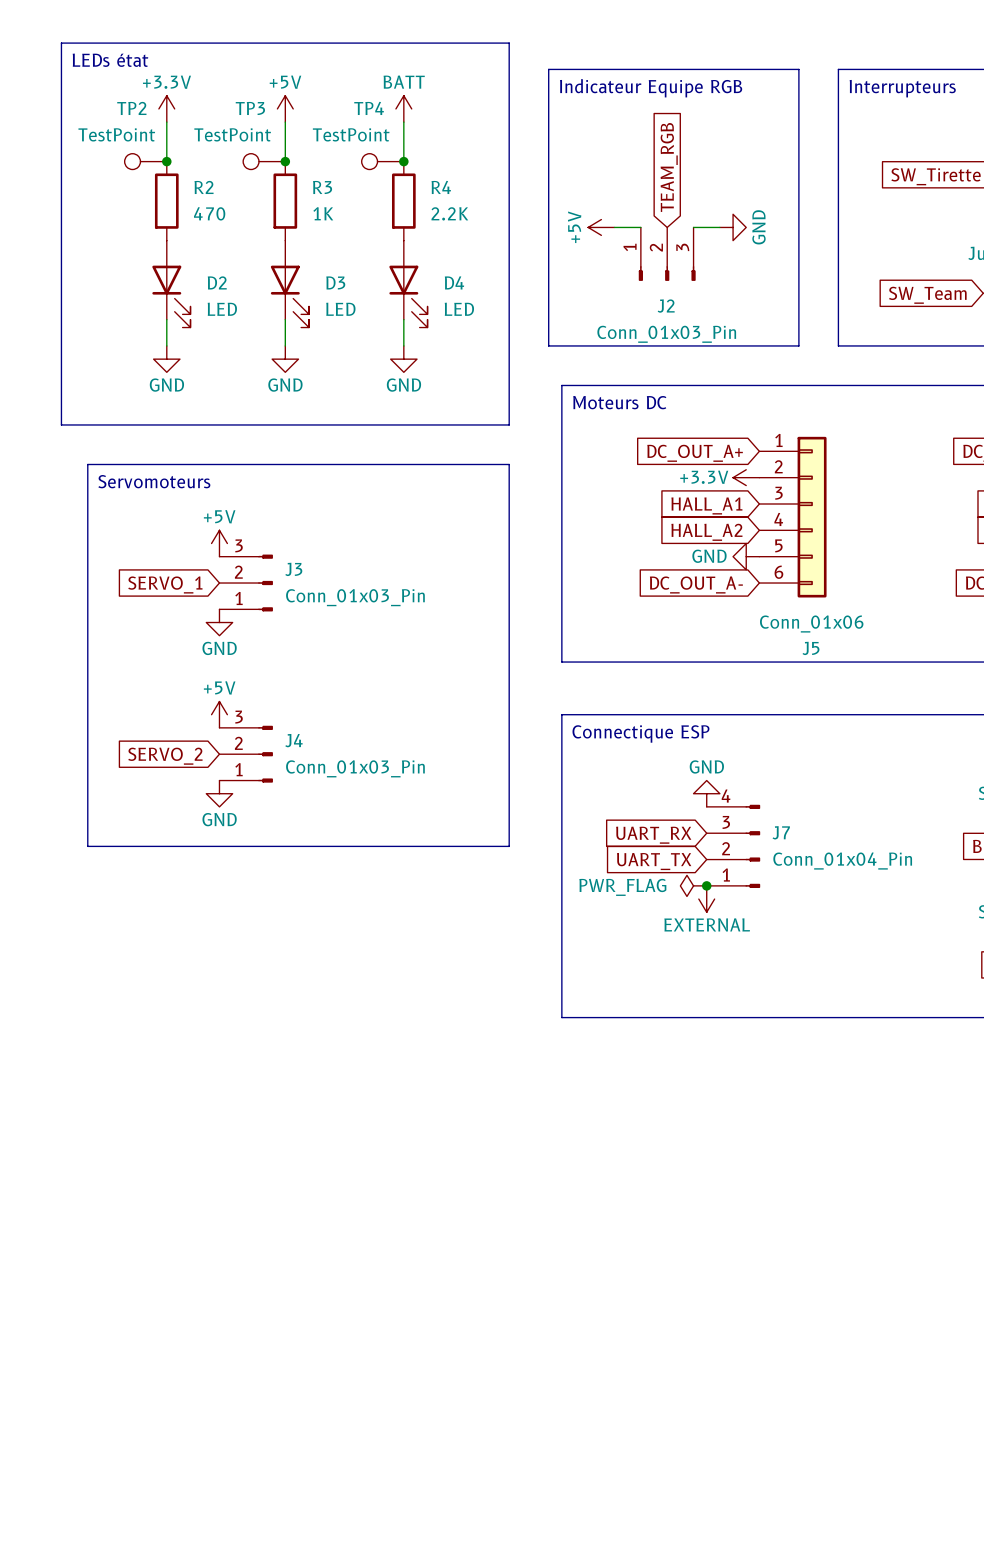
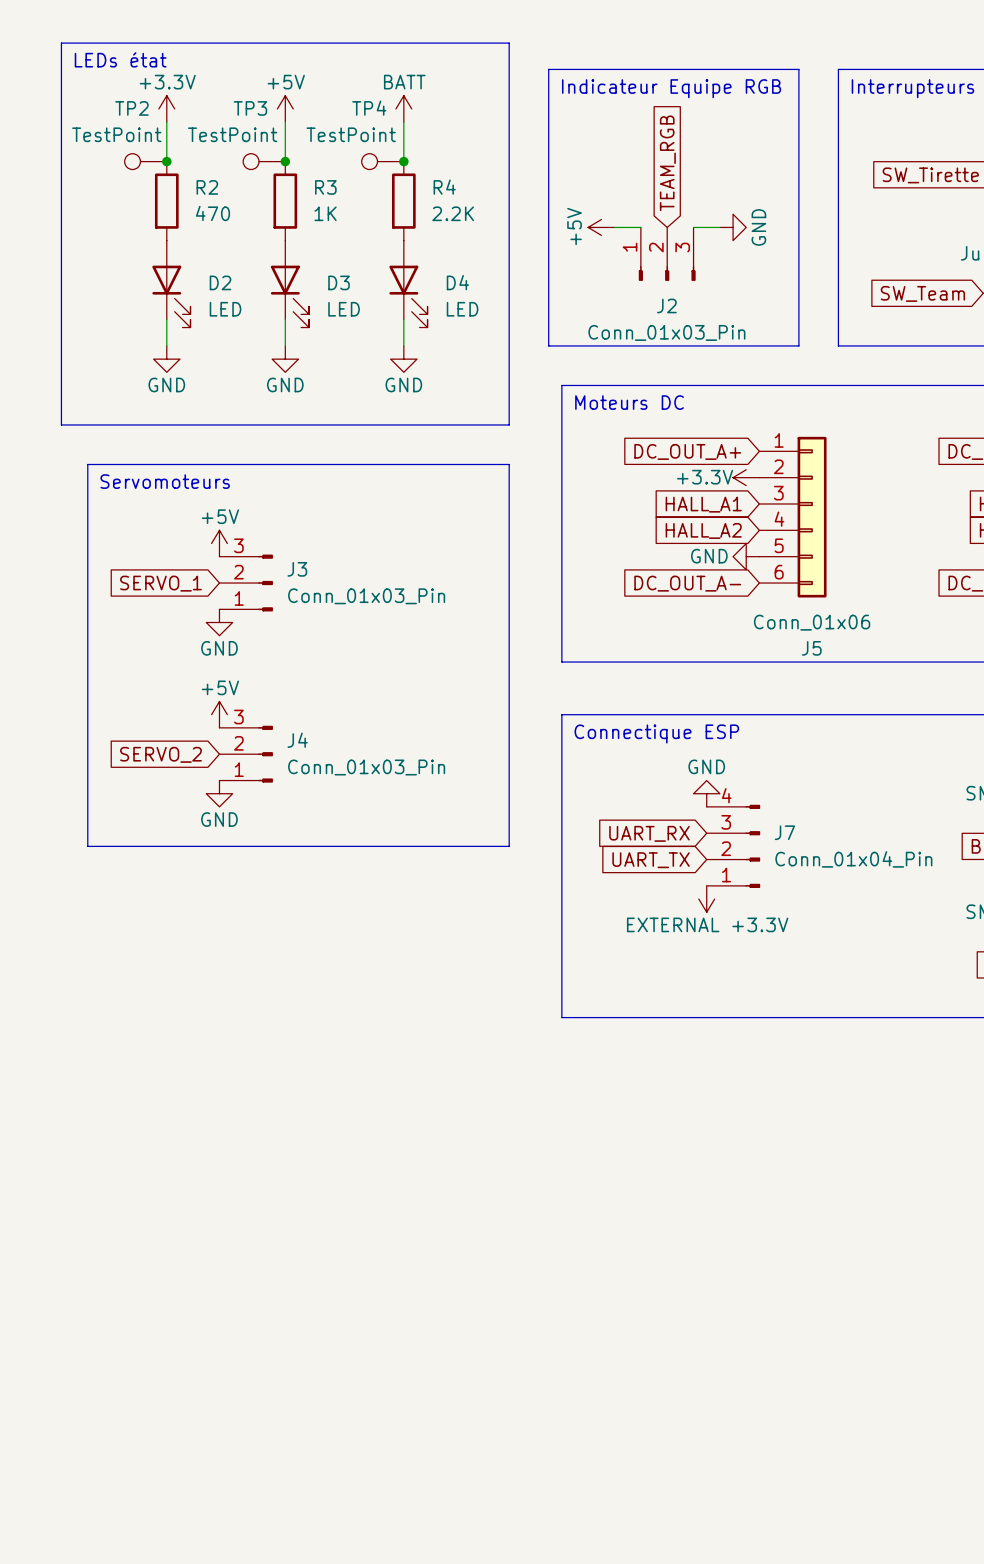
power symbol: PWR_FLAG (693, 885) -> none
junction: (706, 885) -> none
power symbol: EXTERNAL (706, 899) -> EXTERNAL +3.3V (706, 899)

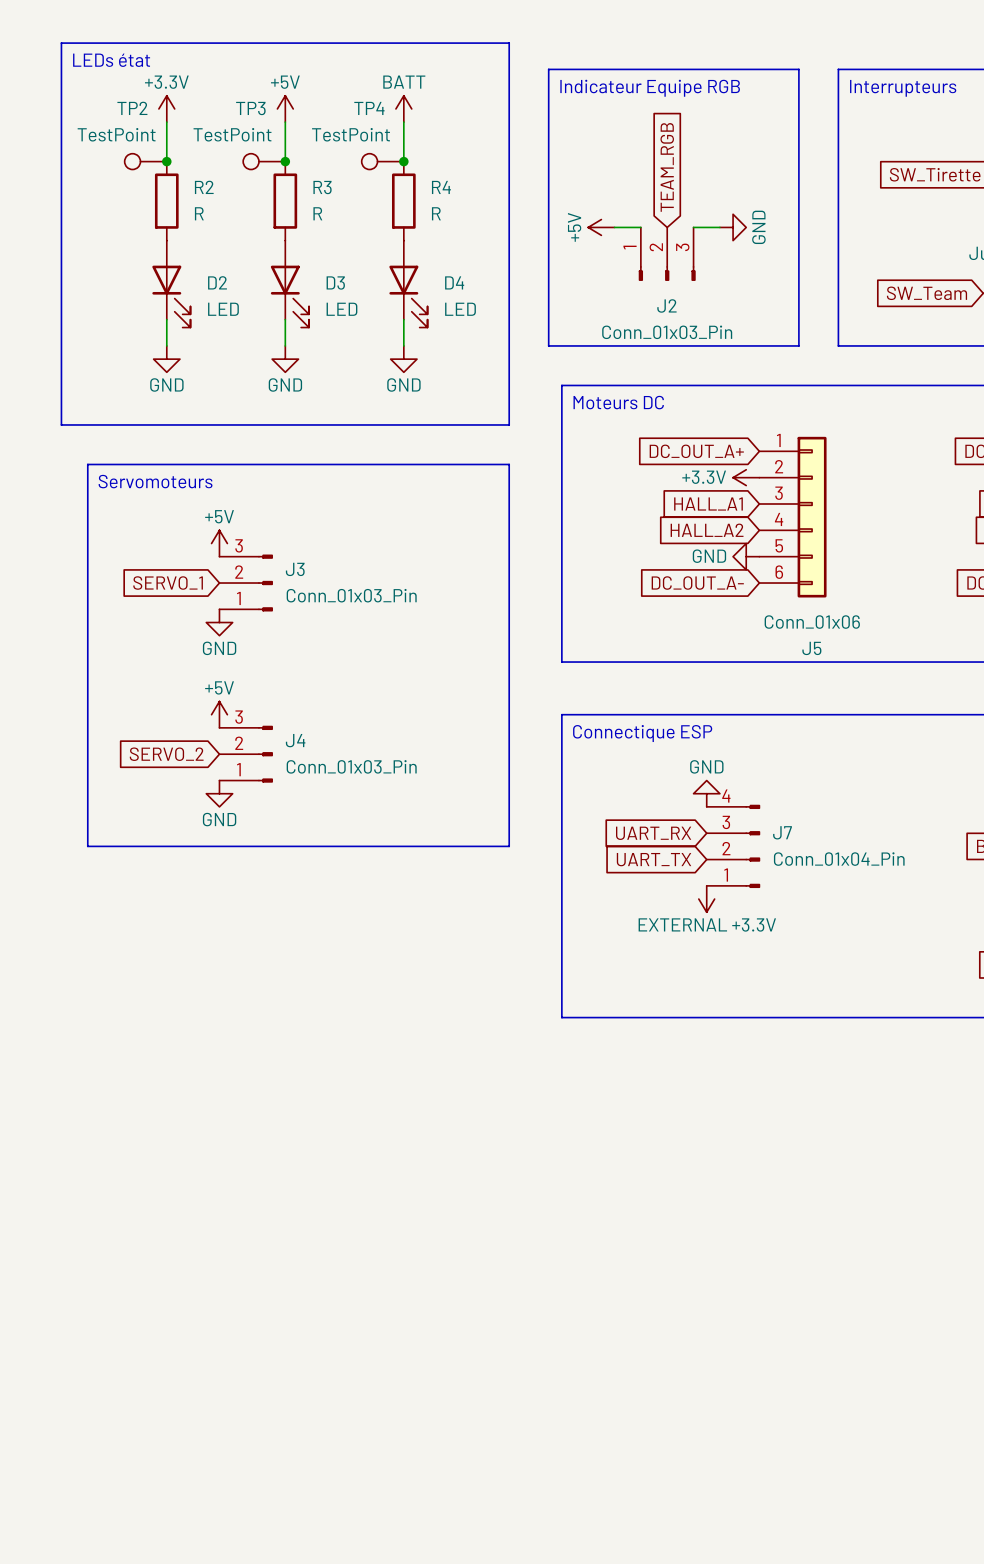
R2 value: 470 (212, 213) -> R (199, 213)
R3 value: 1K (325, 213) -> R (317, 213)
R4 value: 2.2K (453, 213) -> R (436, 213)

